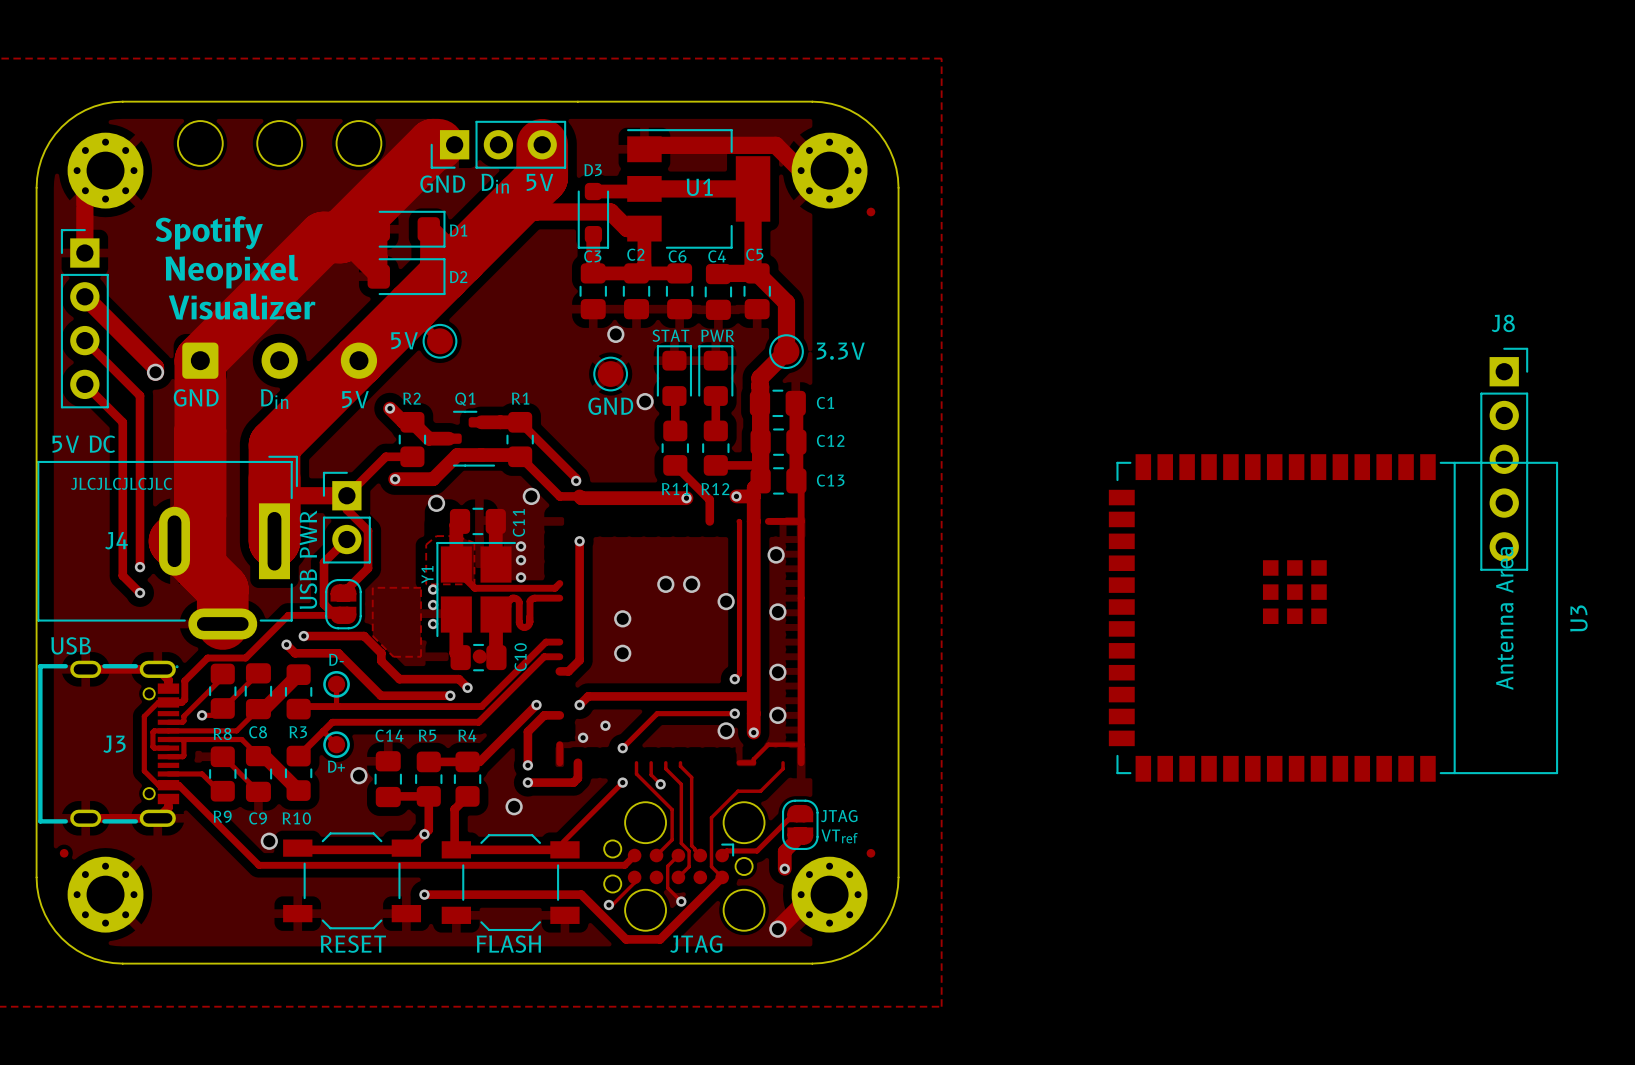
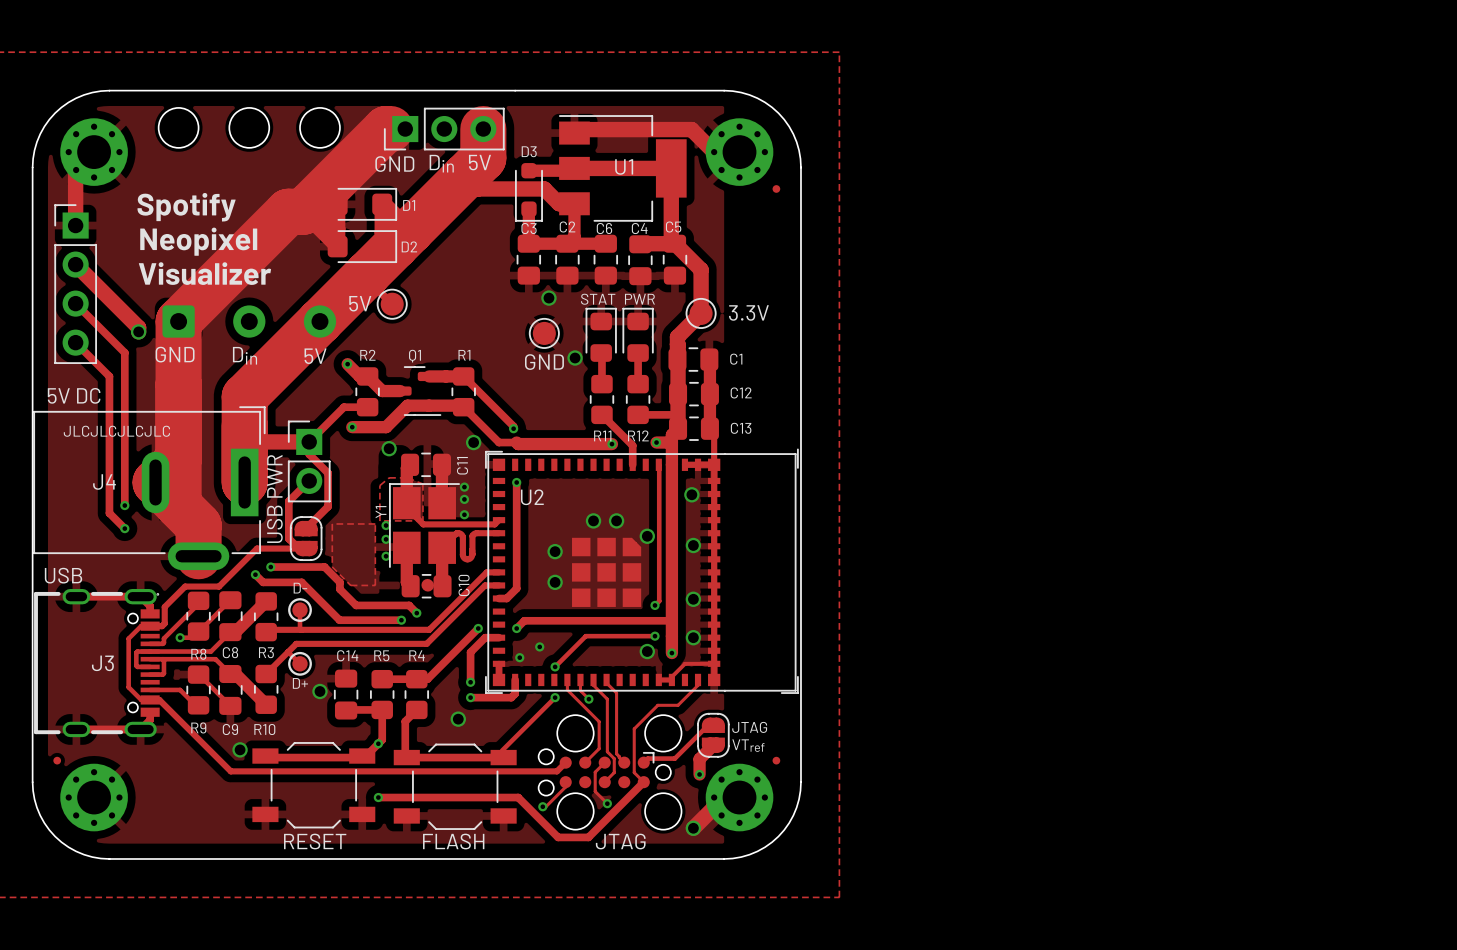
J8: (1504, 459) -> none
U3: (1333, 617) -> none
U2: none -> (641, 571)

